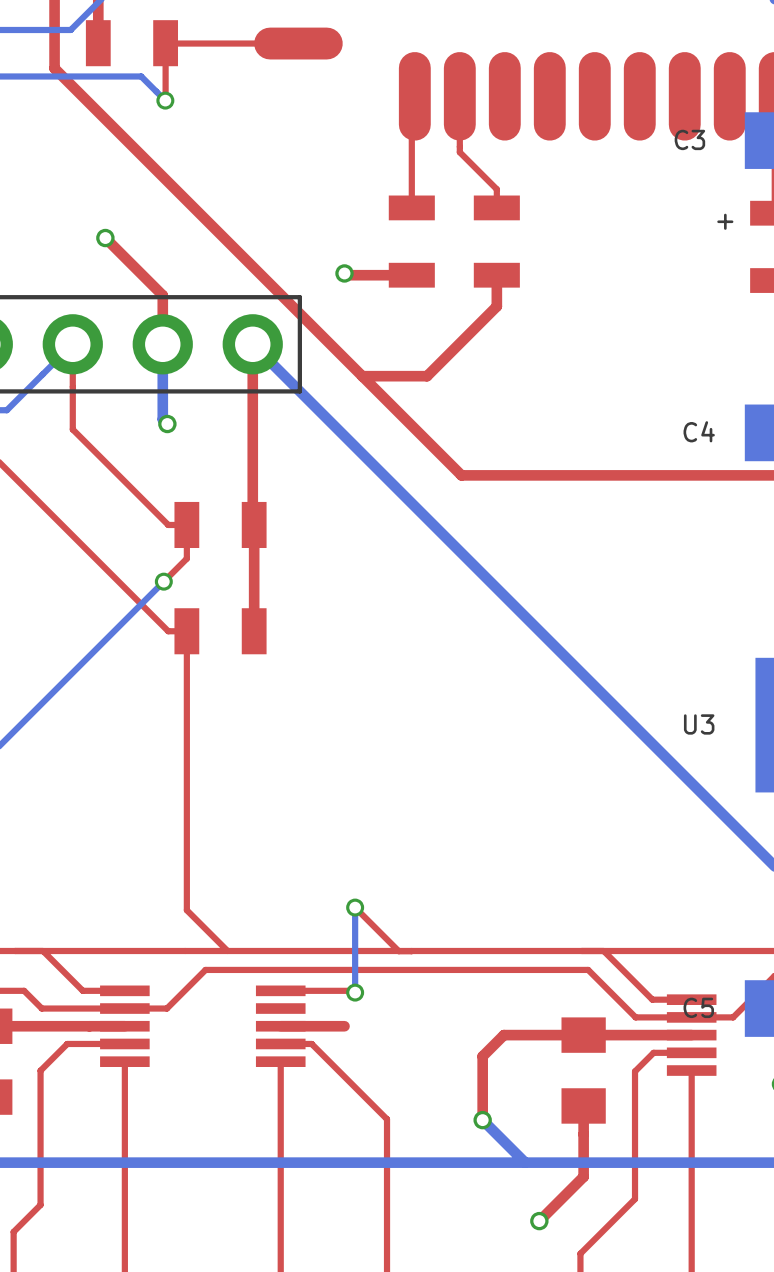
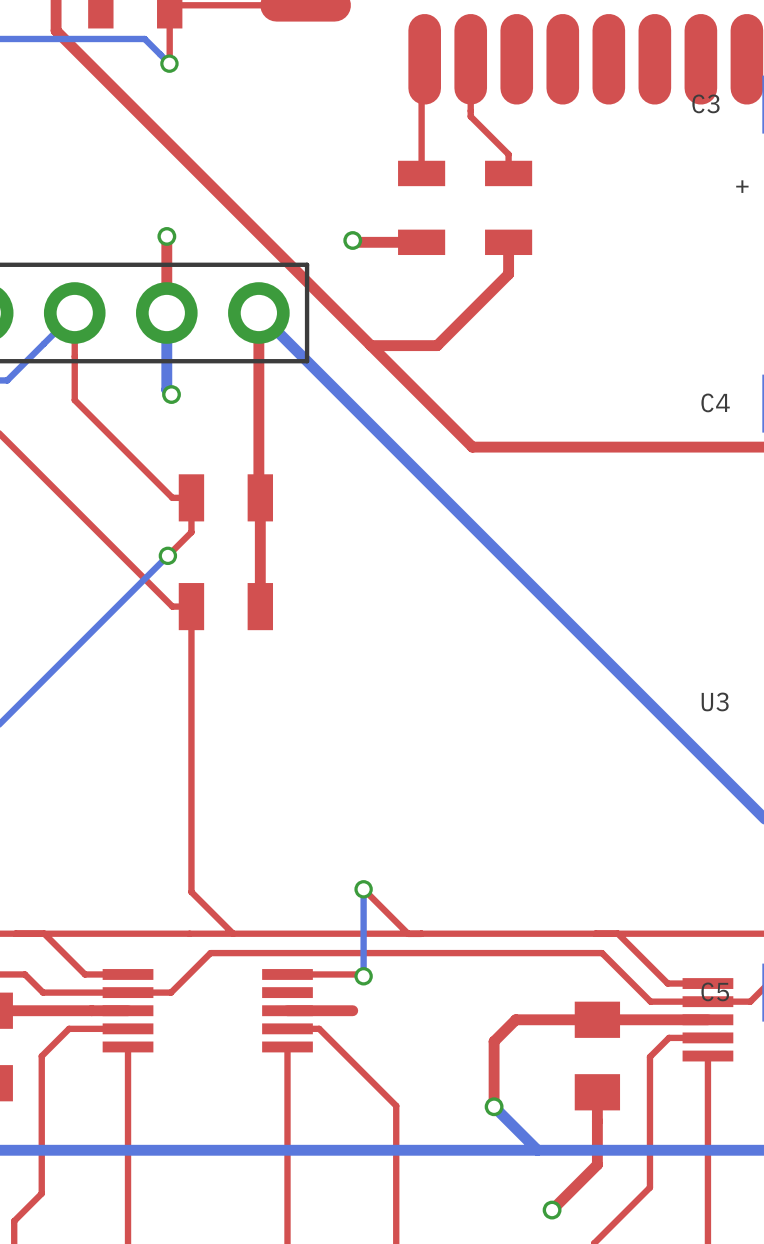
top track: (105, 238) (162, 295) -> (166, 236) (166, 262)
via position: (105, 238) -> (166, 236)

